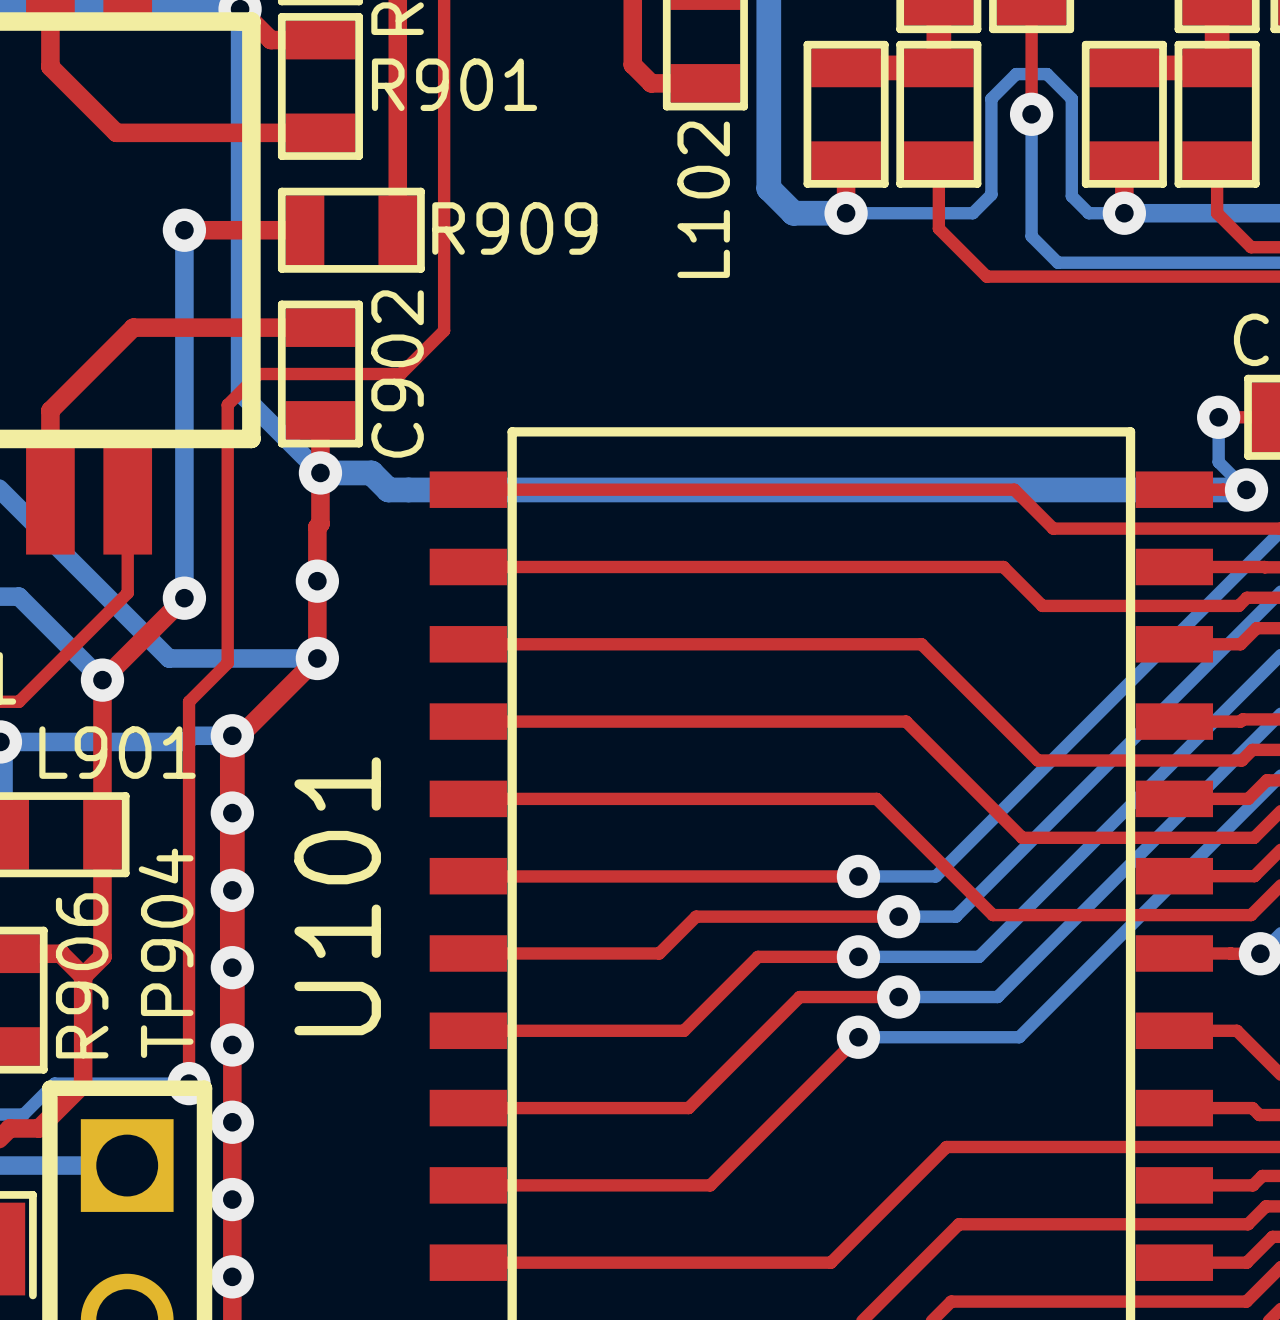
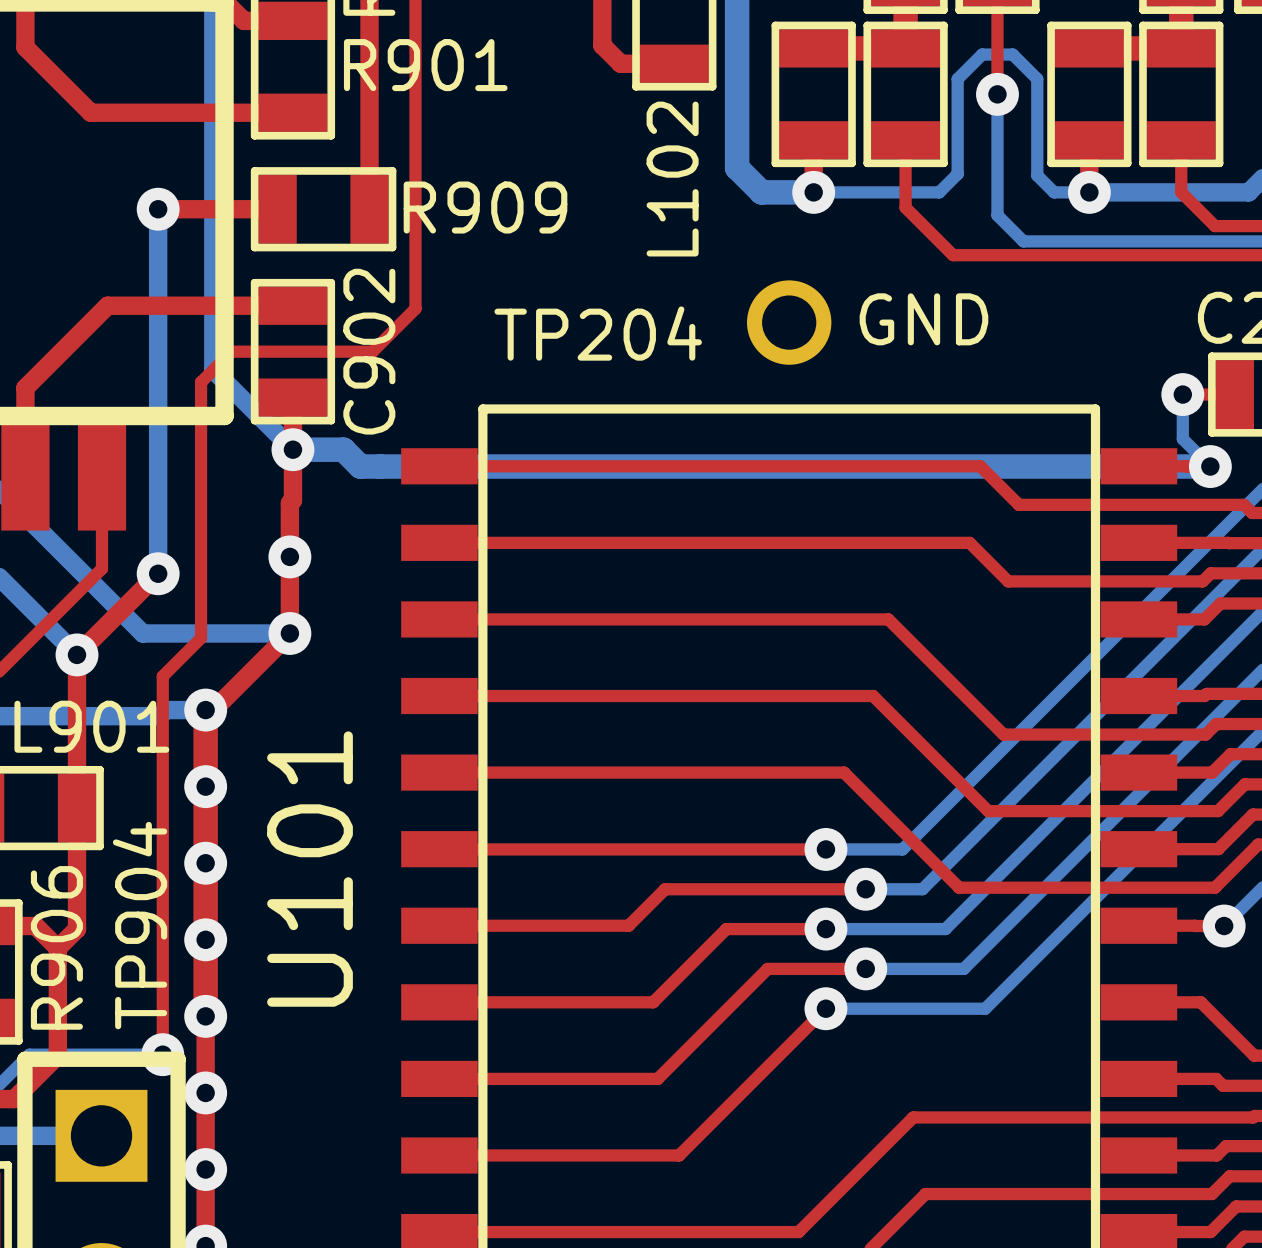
text: none -> GND (923, 319)
TP204: none -> (789, 322)

